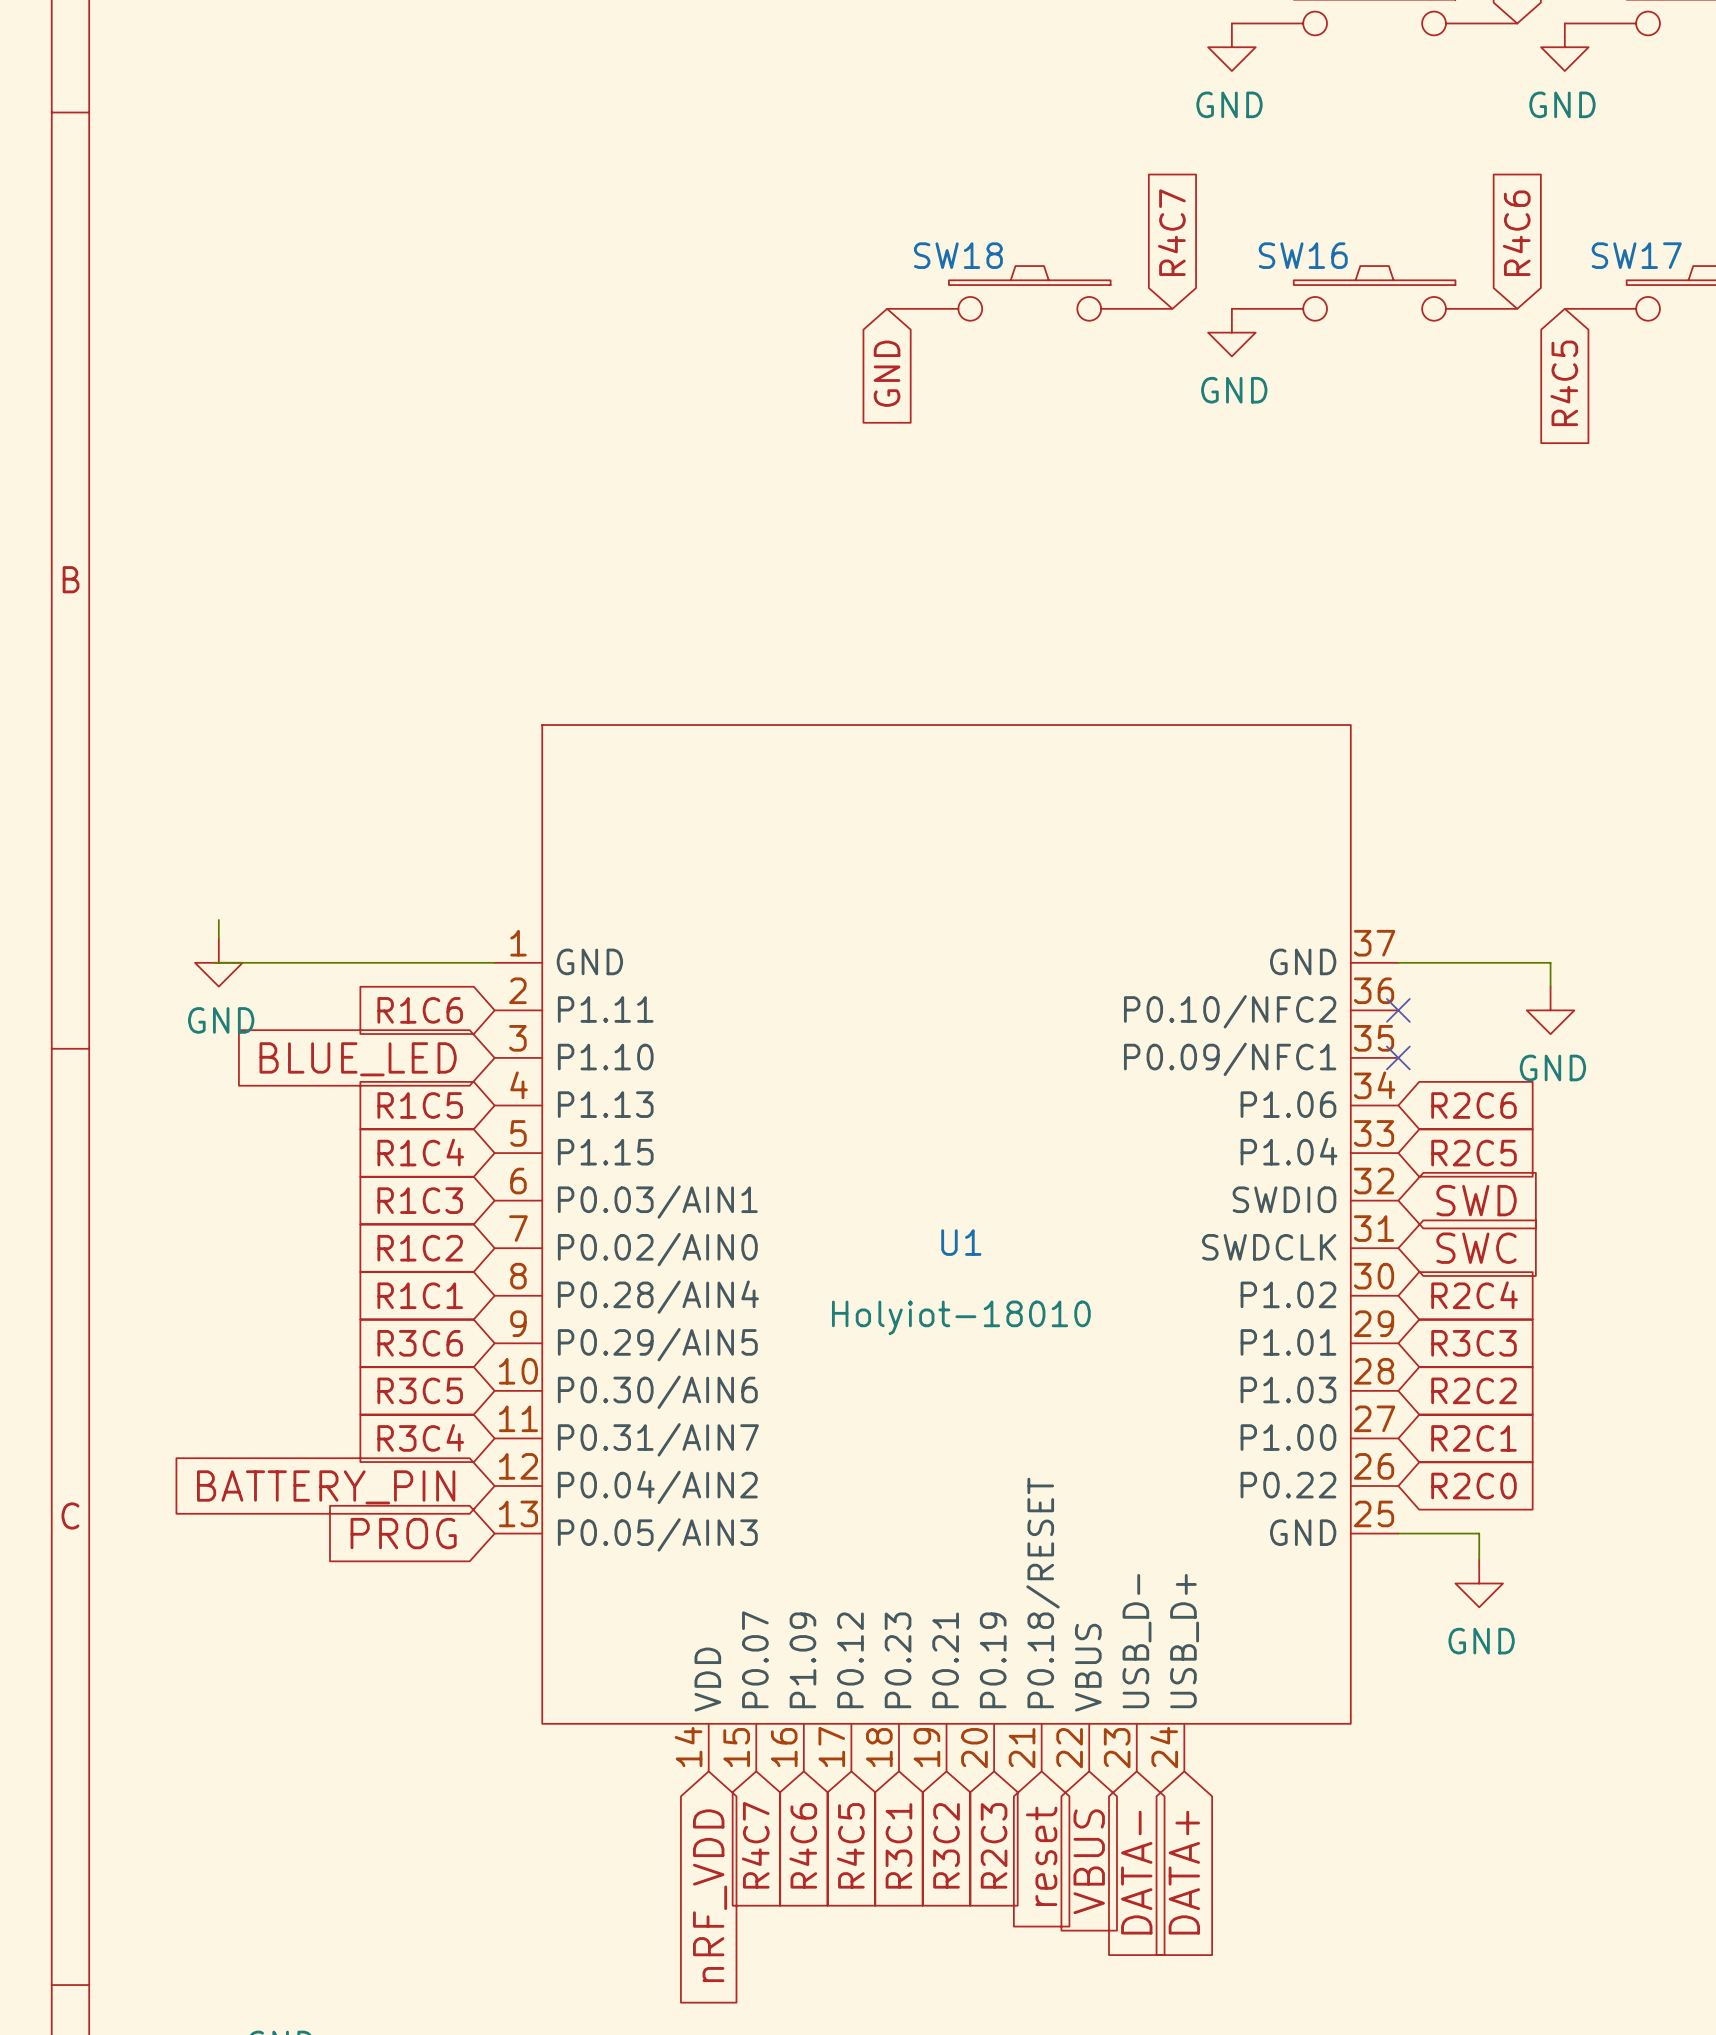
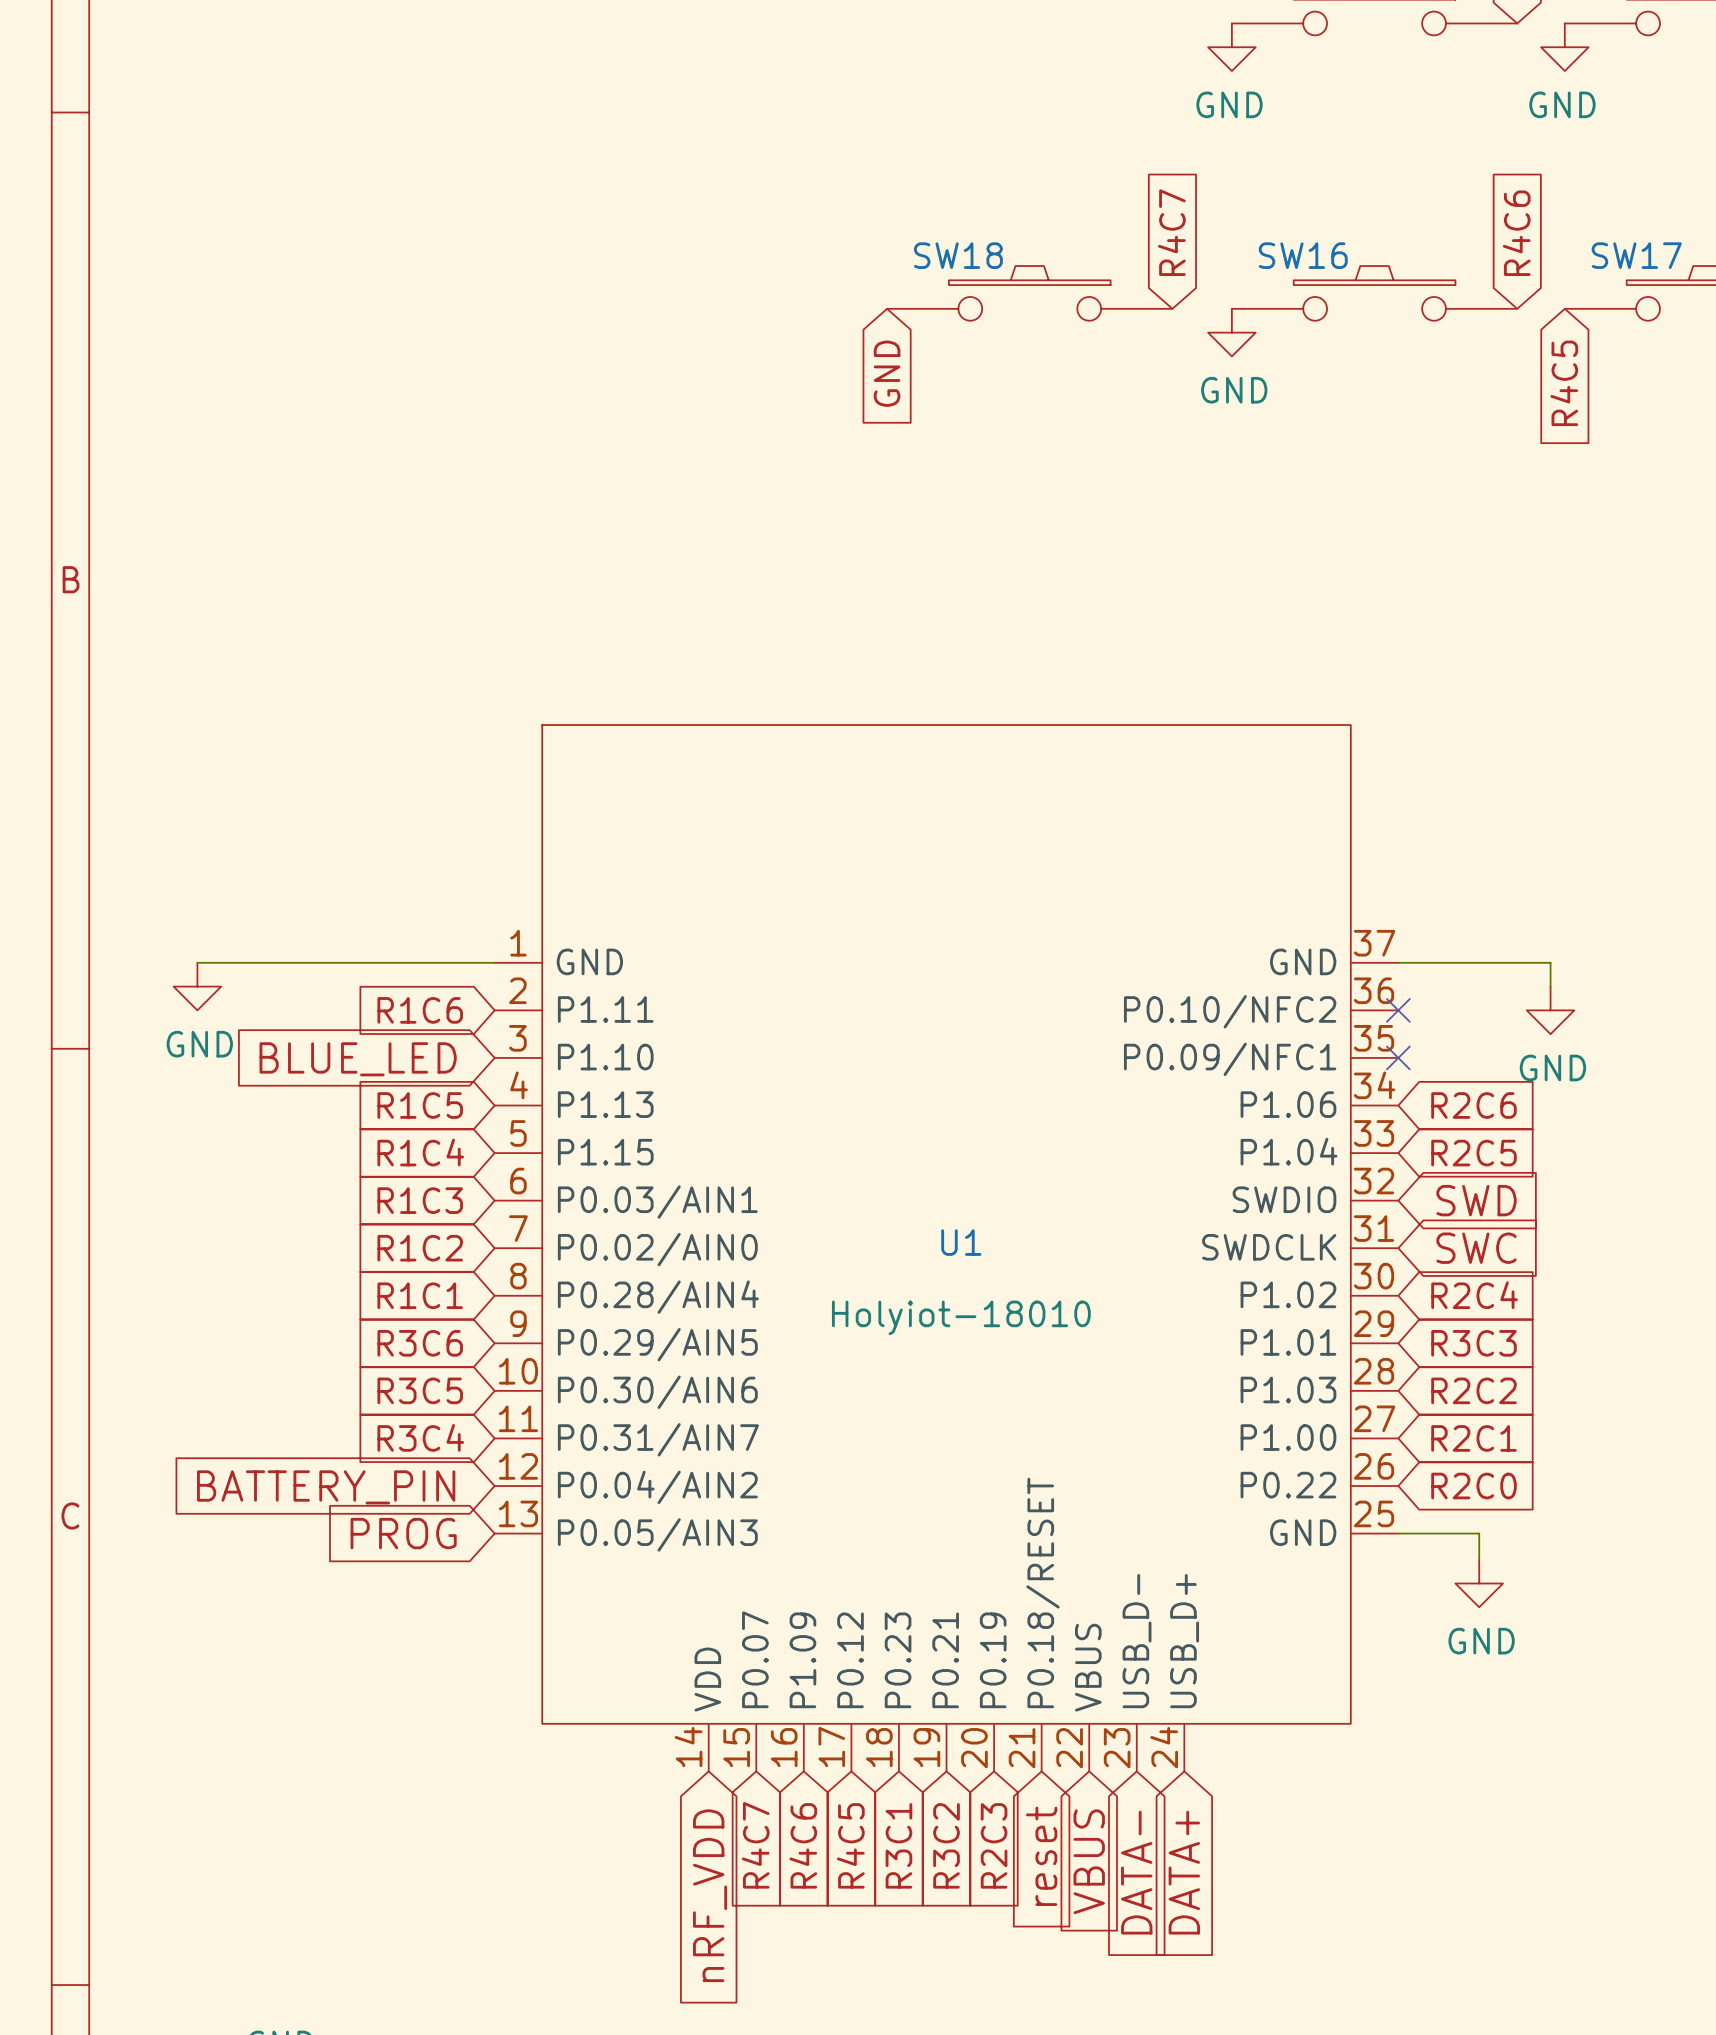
wire: (218, 920) (218, 939) -> none
power symbol position: GND (218, 962) -> GND (197, 986)

